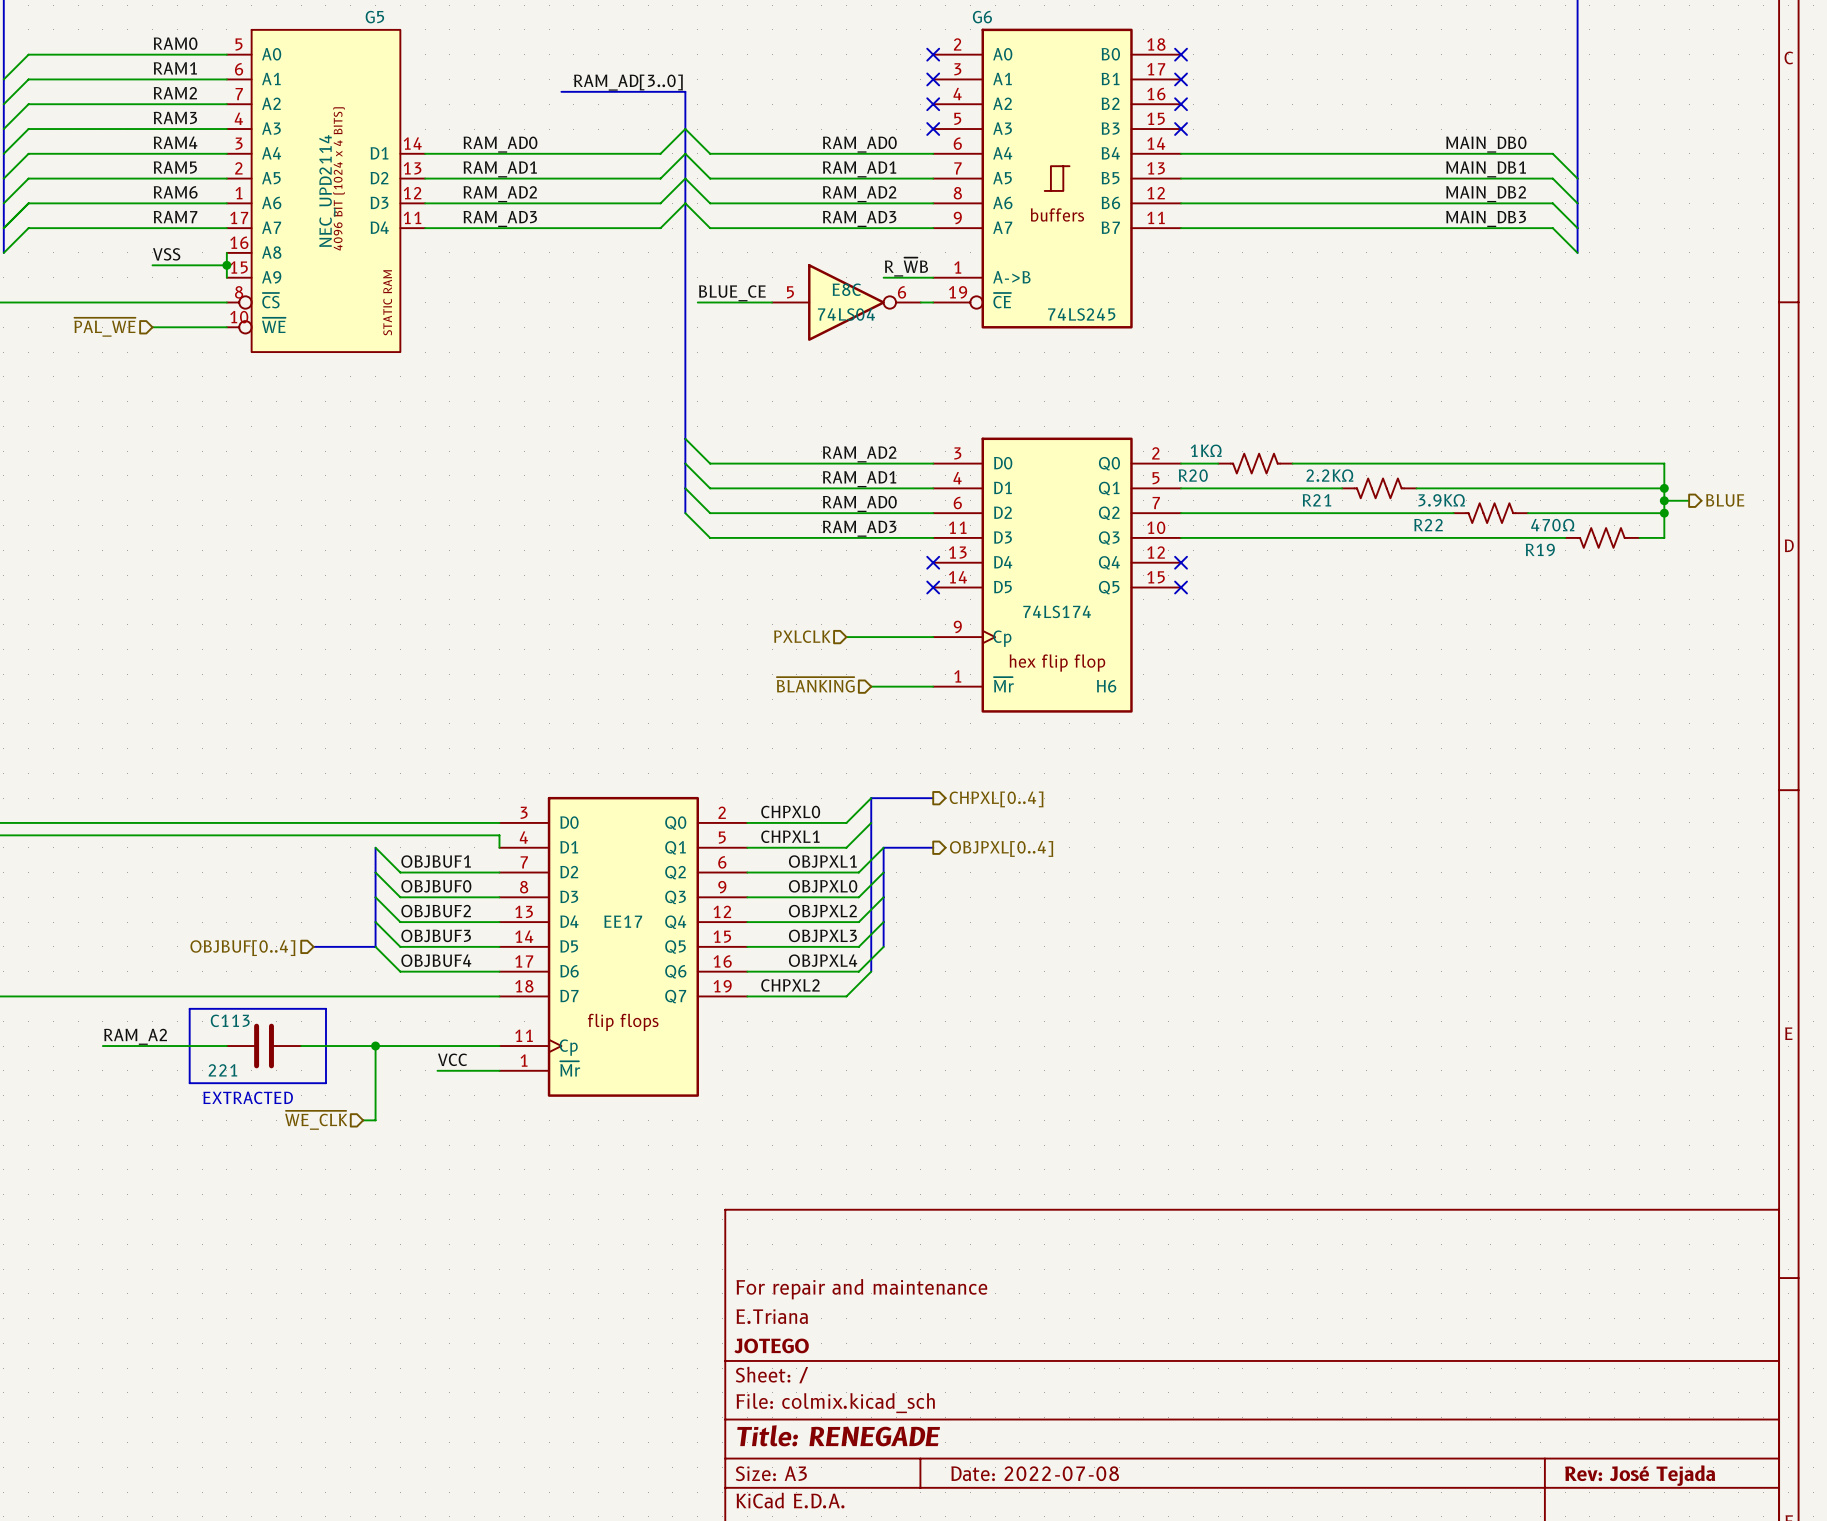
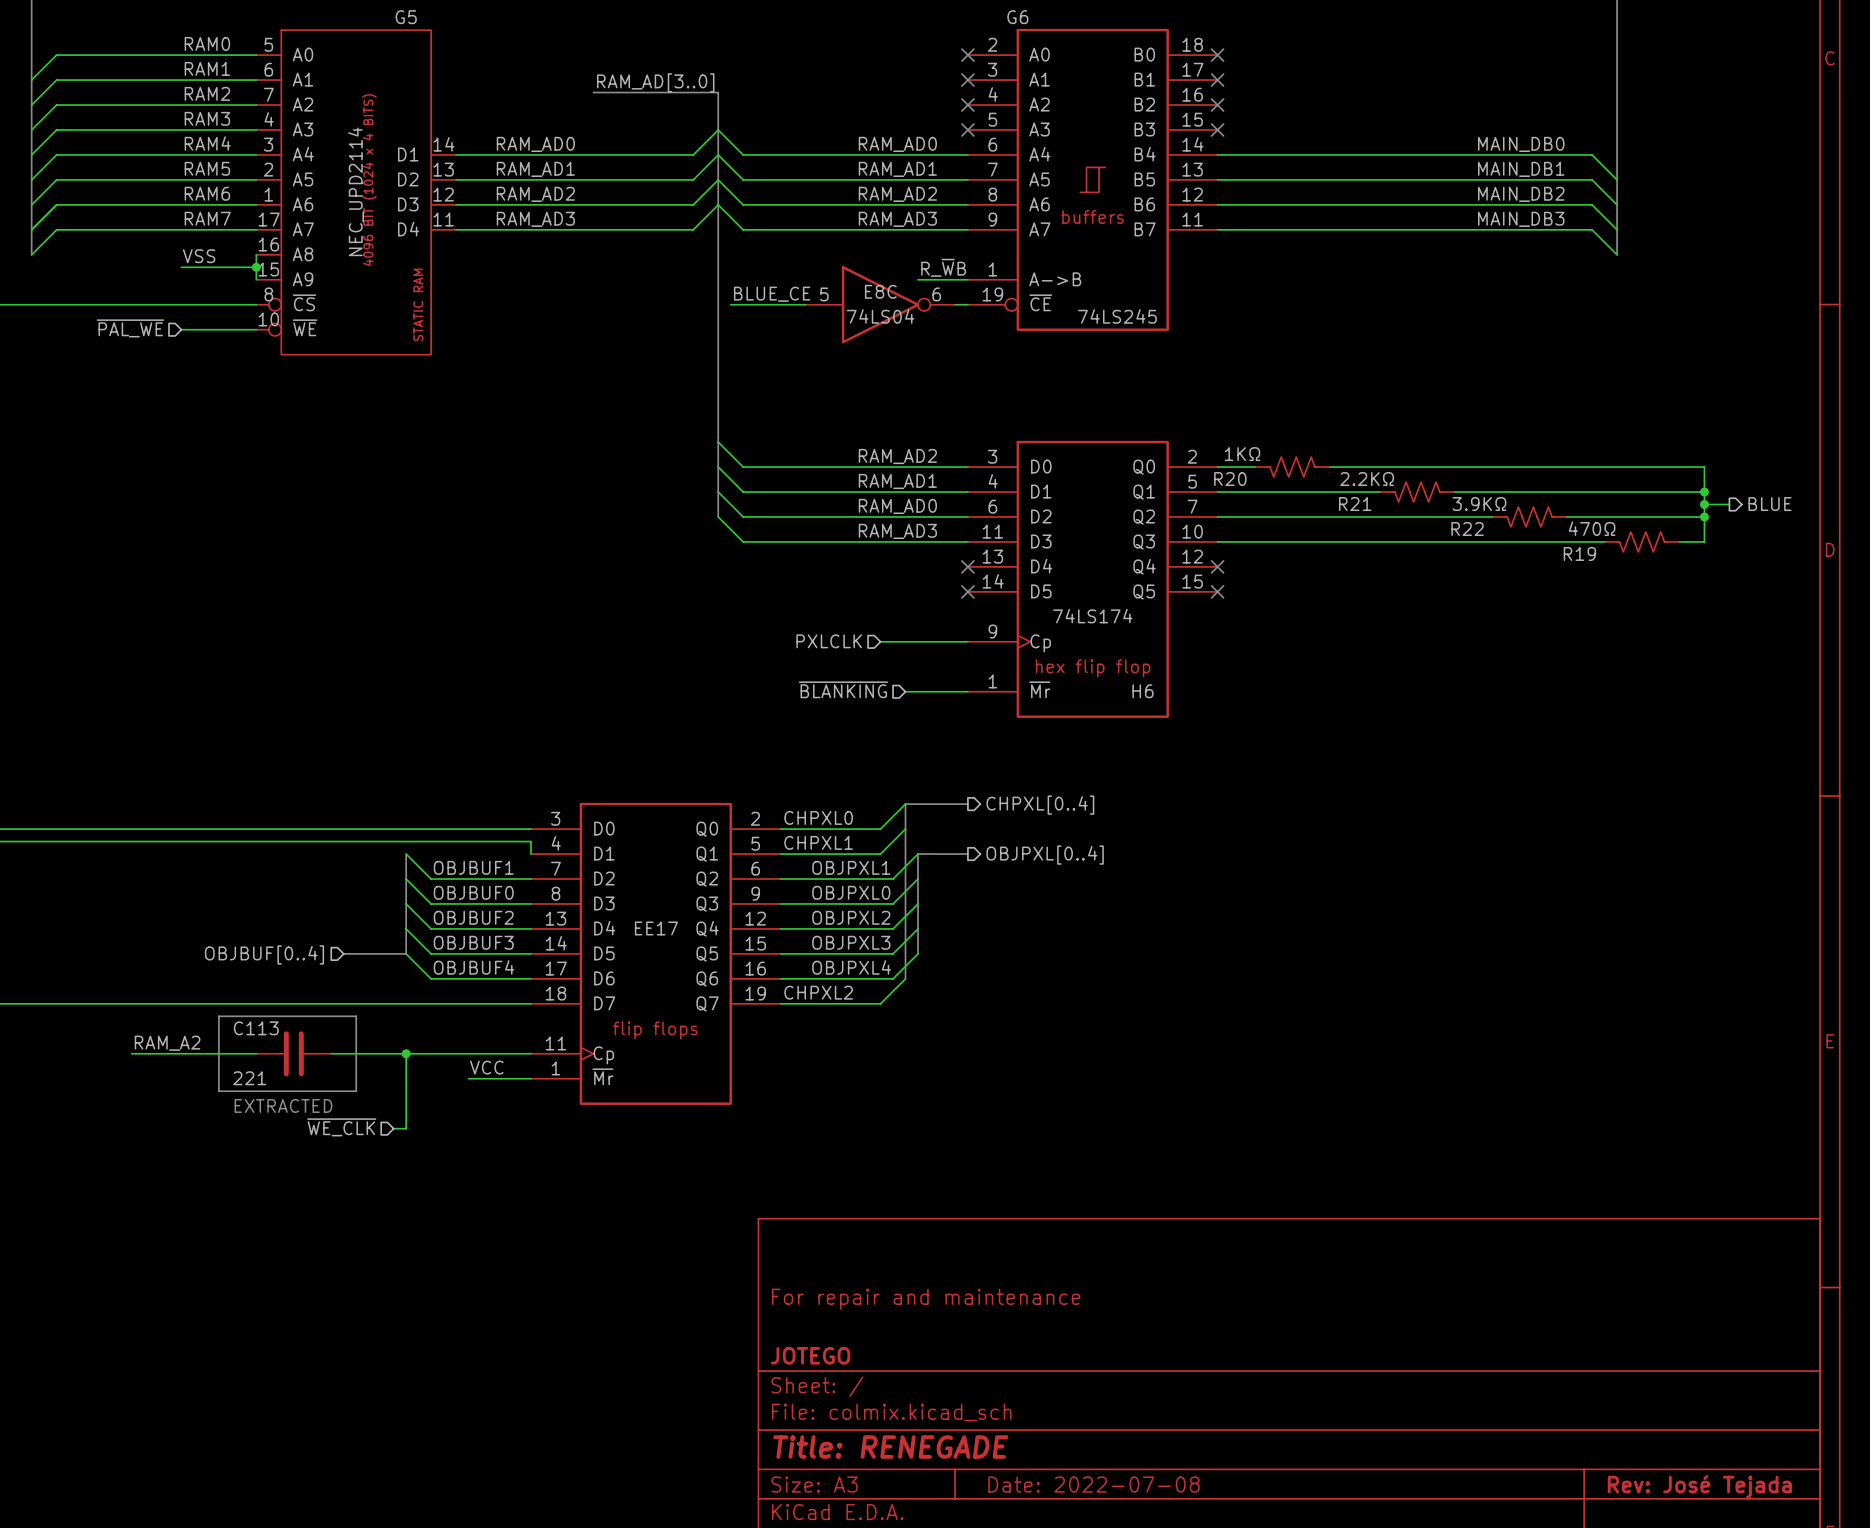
title block: E.Triana (772, 1316) -> none

